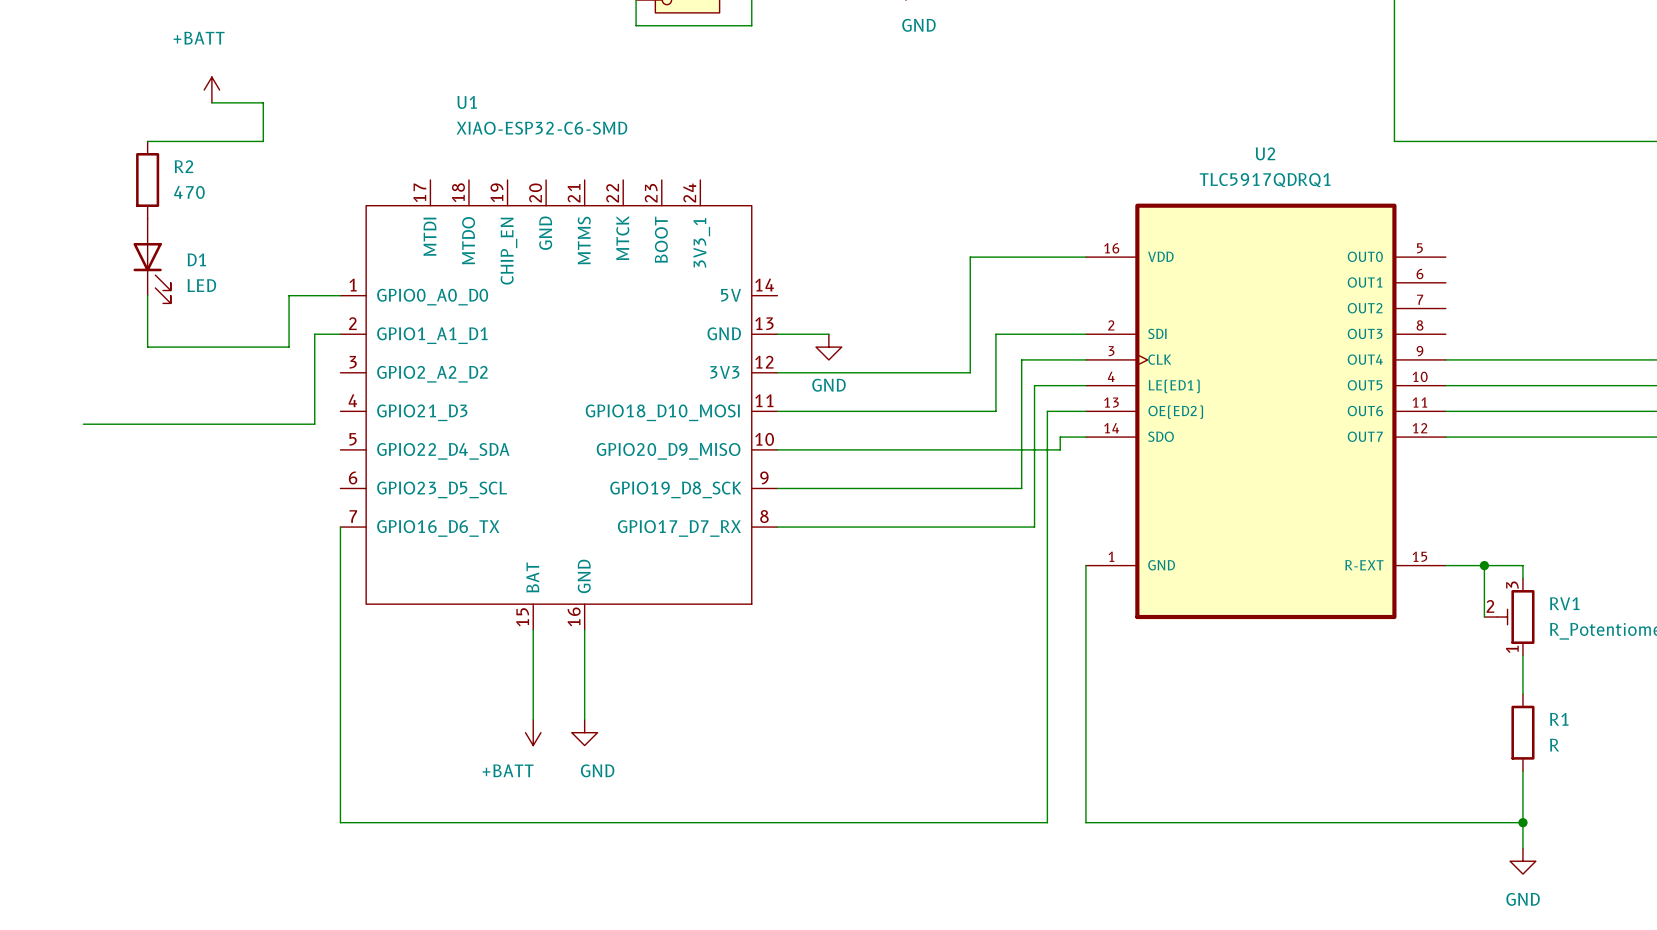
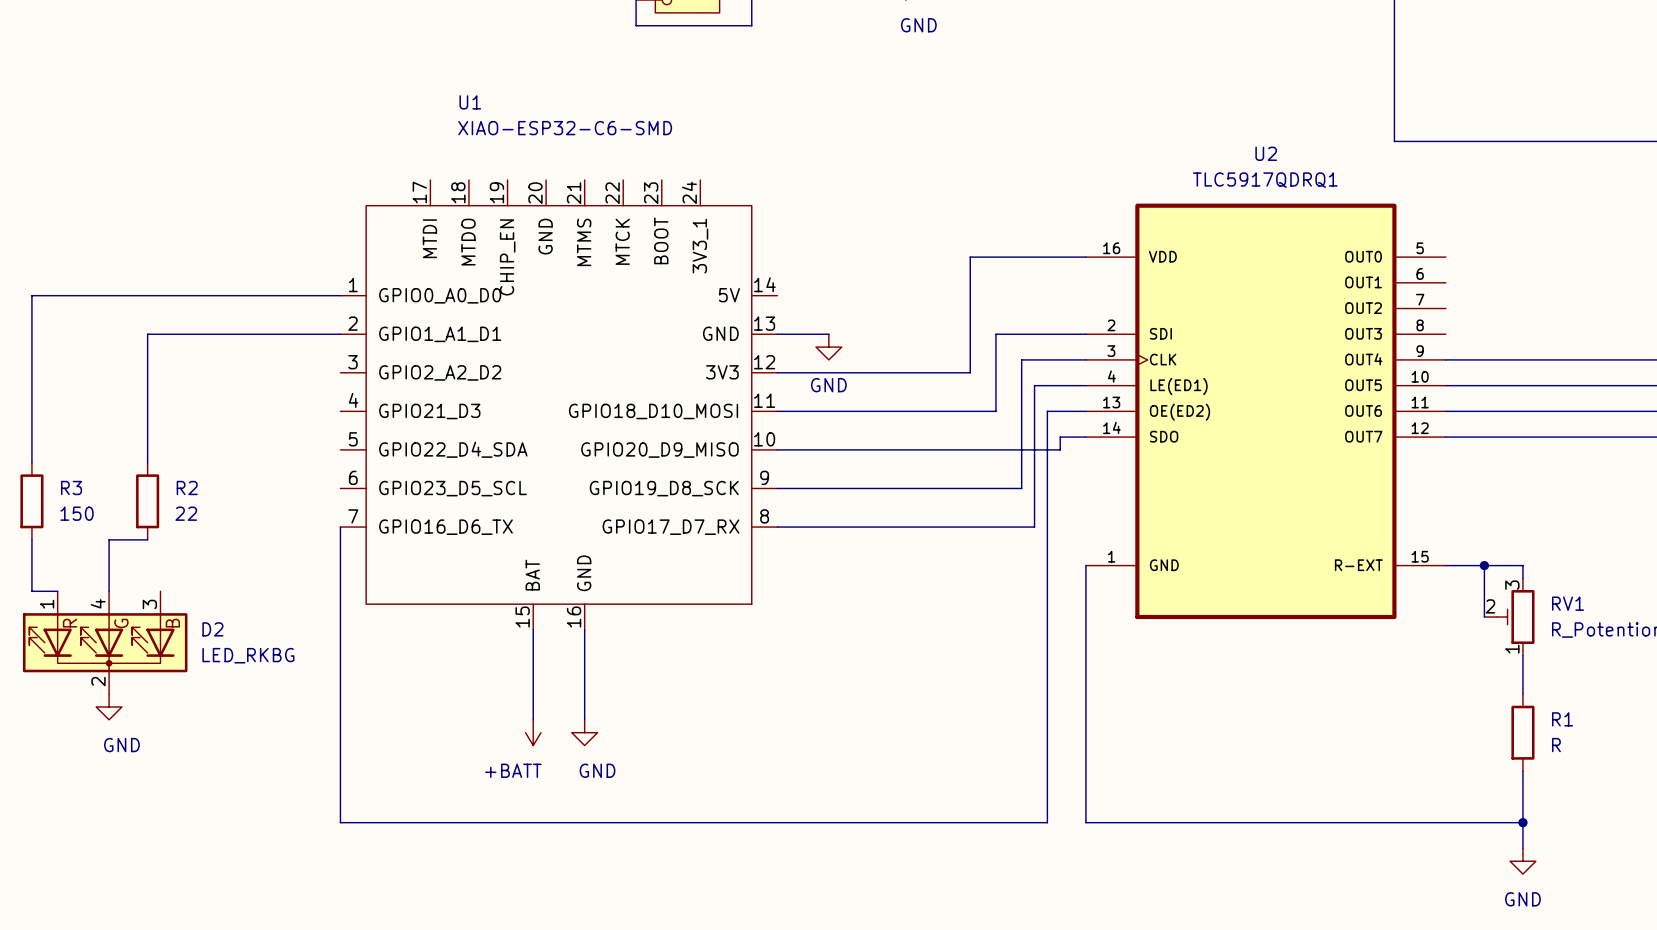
power symbol: +BATT (211, 90) -> none
wire: (211, 102) (263, 102) (263, 141) (147, 141) -> none
R2 position: (147, 179) -> (147, 501)
R2 value: 470 (189, 192) -> 22 (186, 513)
D1: LED (152, 260) -> none
wire: (147, 295) (147, 334) -> none
wire: (289, 295) (289, 347) (147, 347) -> (289, 295) (31, 295) (31, 462)
wire: (314, 334) (314, 424) (83, 424) -> (314, 334) (147, 334)
wire: none -> (147, 347) (147, 462)
R3: none -> 150 (31, 501)
wire: none -> (31, 539) (31, 591) (57, 591)
wire: none -> (147, 539) (109, 539) (109, 591)
D2: none -> LED_RKBG (105, 642)
power symbol: none -> GND (109, 706)

